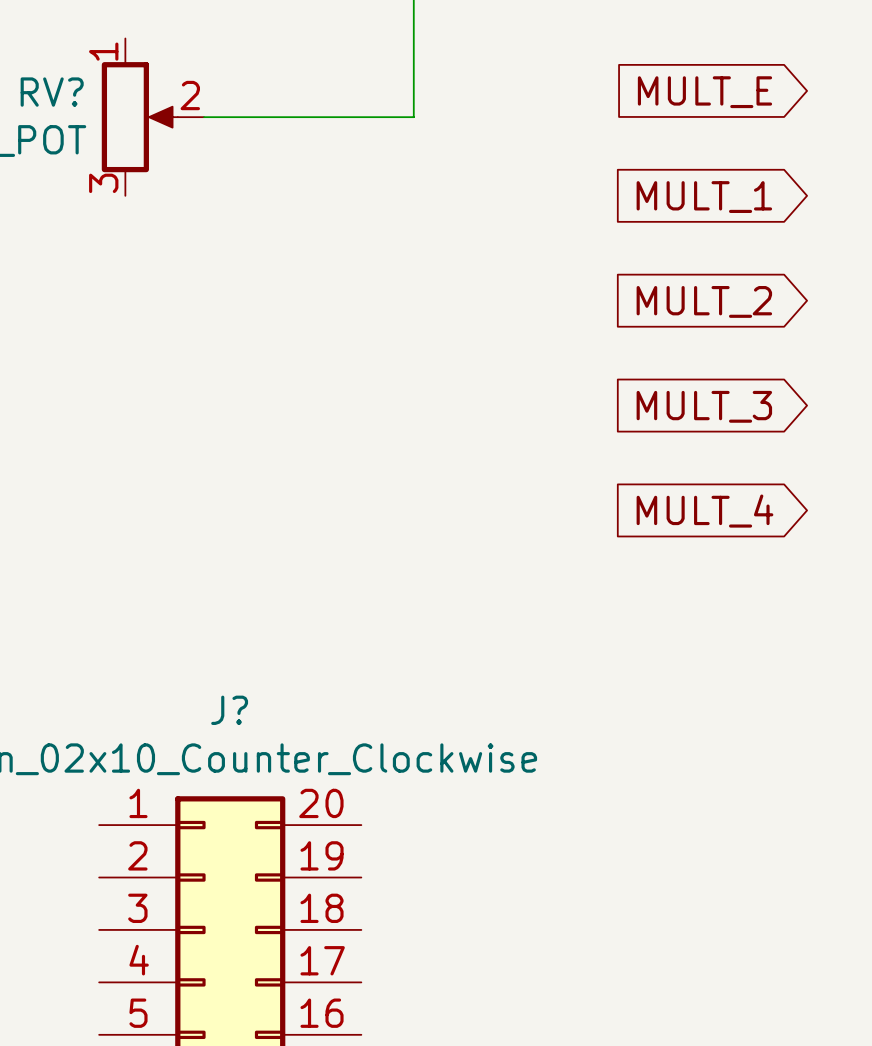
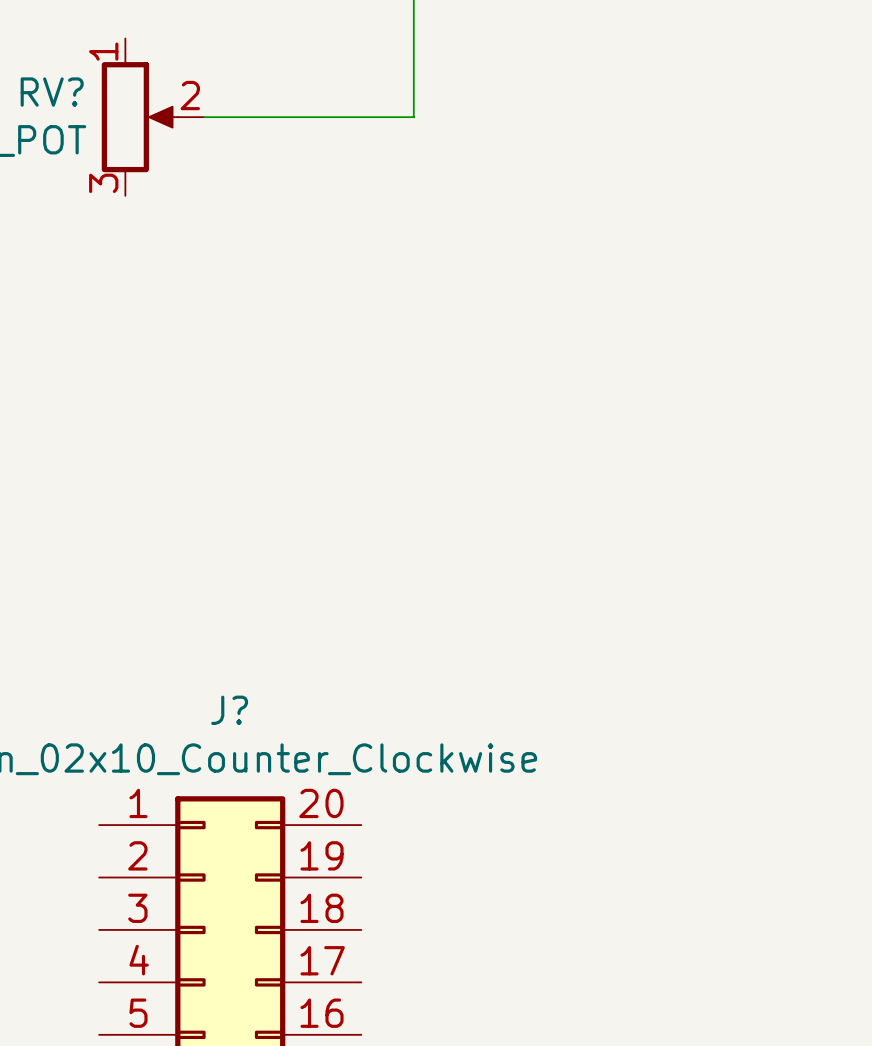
global label: MULT_E (704, 92) -> none
global label: MULT_1 (704, 197) -> none
global label: MULT_2 (704, 301) -> none
global label: MULT_3 (704, 406) -> none
global label: MULT_4 (704, 511) -> none

